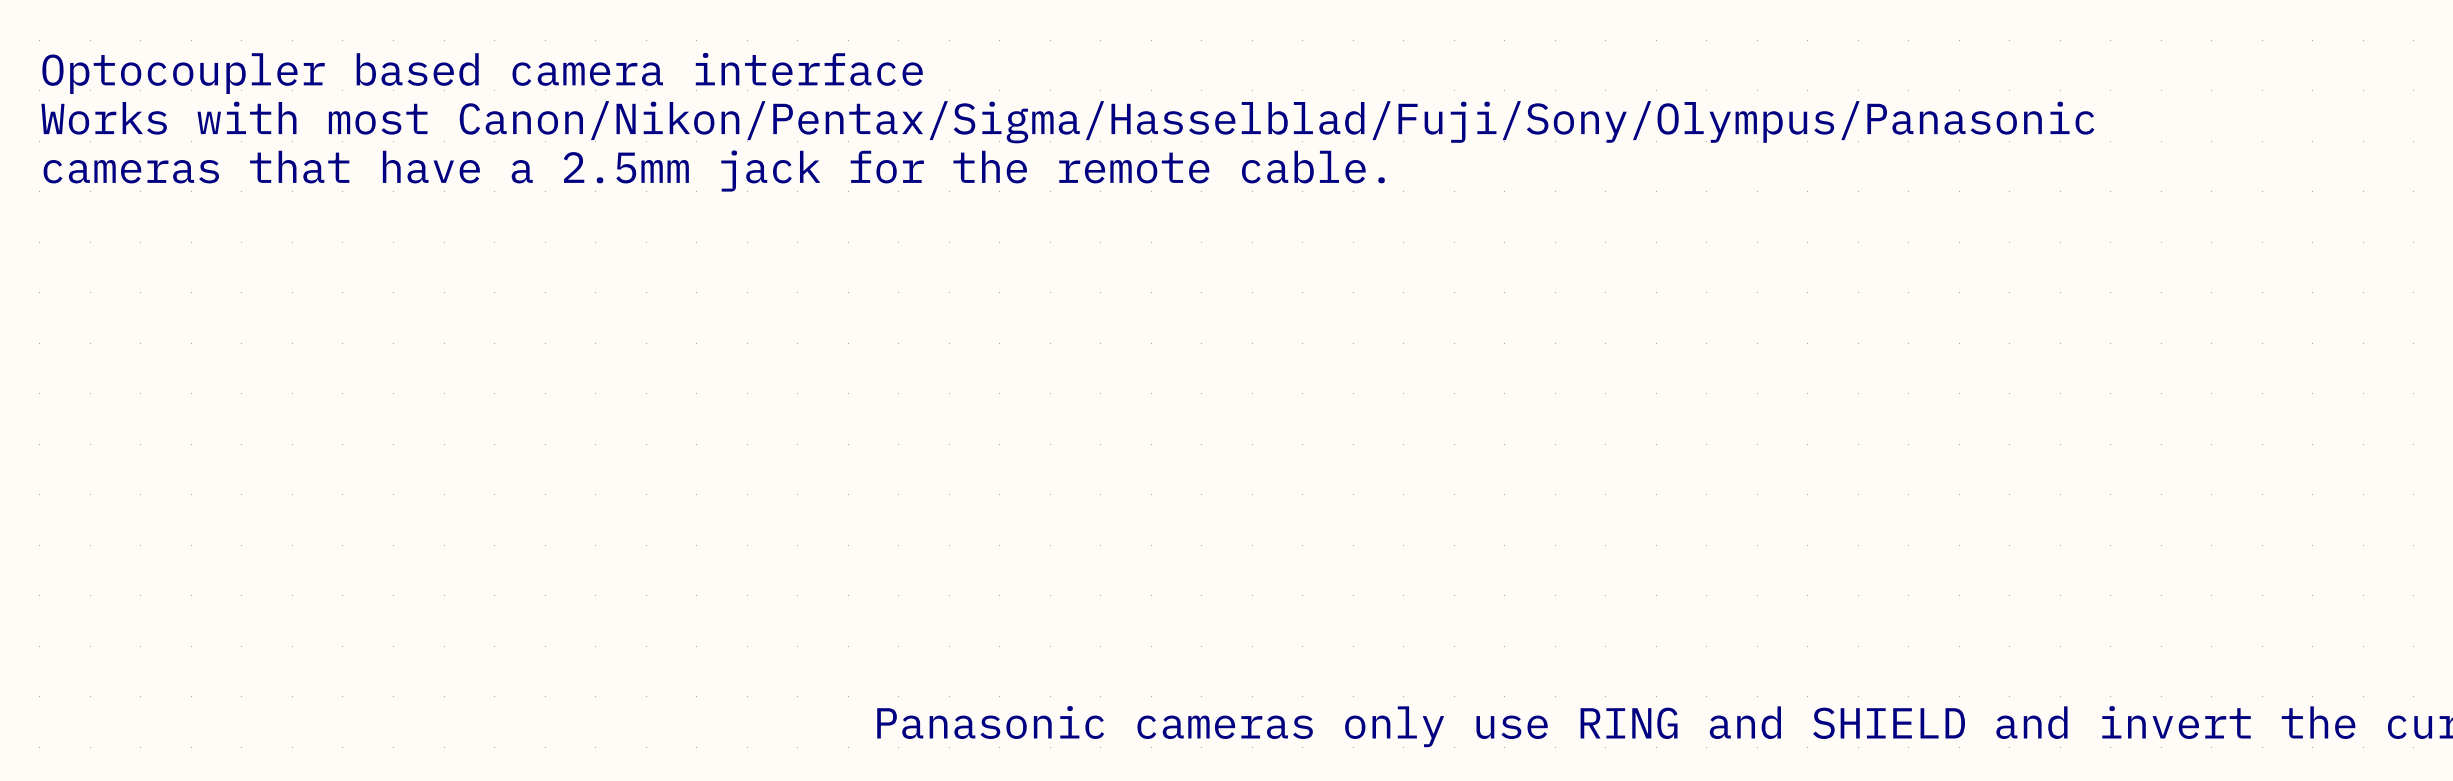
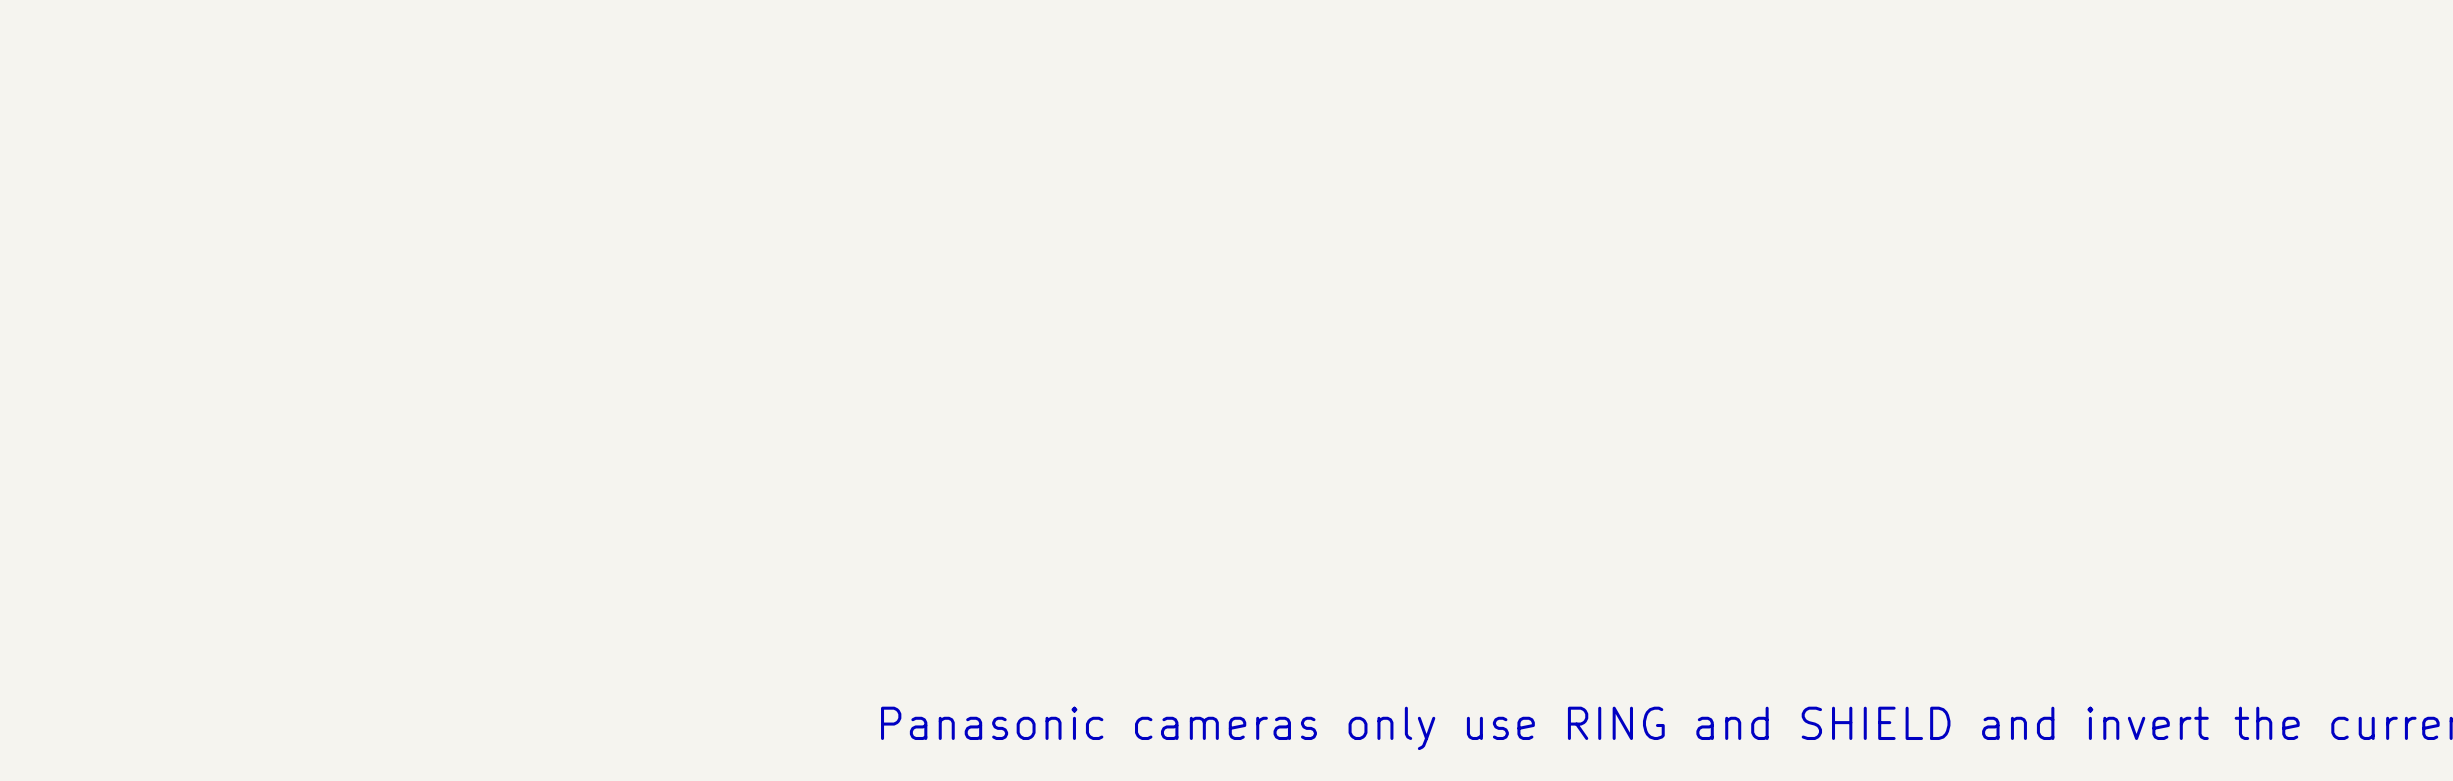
text: Optocoupler based camera interface (482, 73) -> none
text: Works with most Canon/Nikon/Pentax/Sigma/Hasselblad/Fuji/Sony/Olympus/Panasonic (1067, 122) -> none
text: cameras that have a 2.5mm jack for the remote cable. (714, 171) -> none

